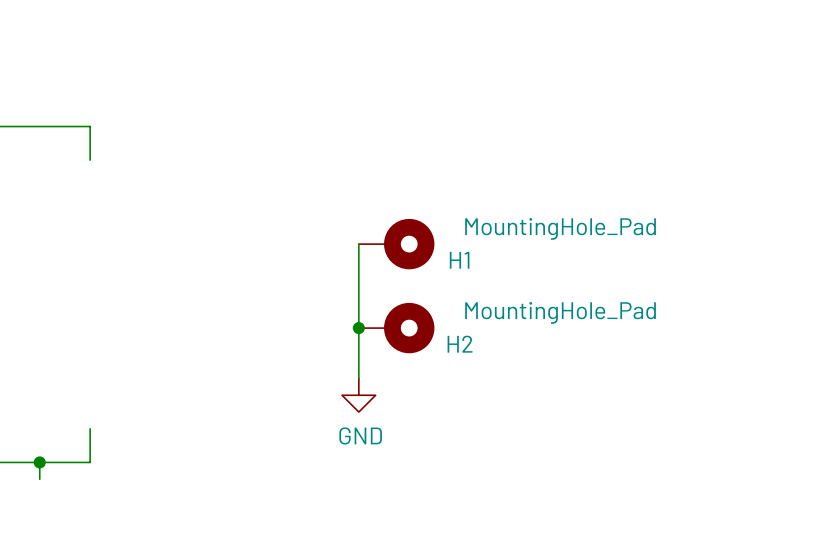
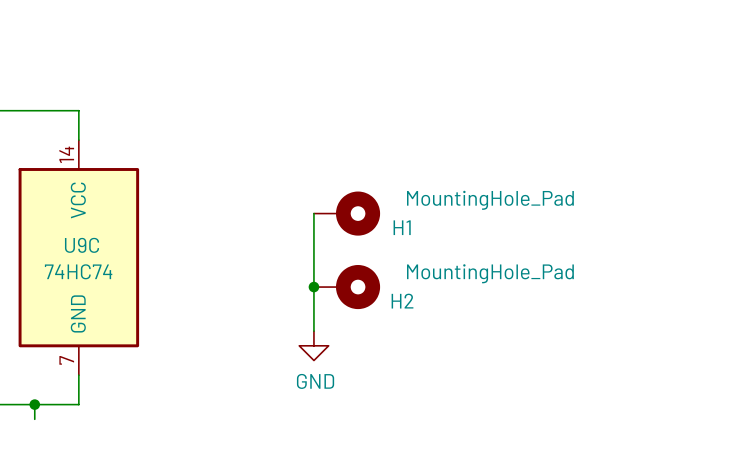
U9C: none -> 74HC74 (78, 257)

